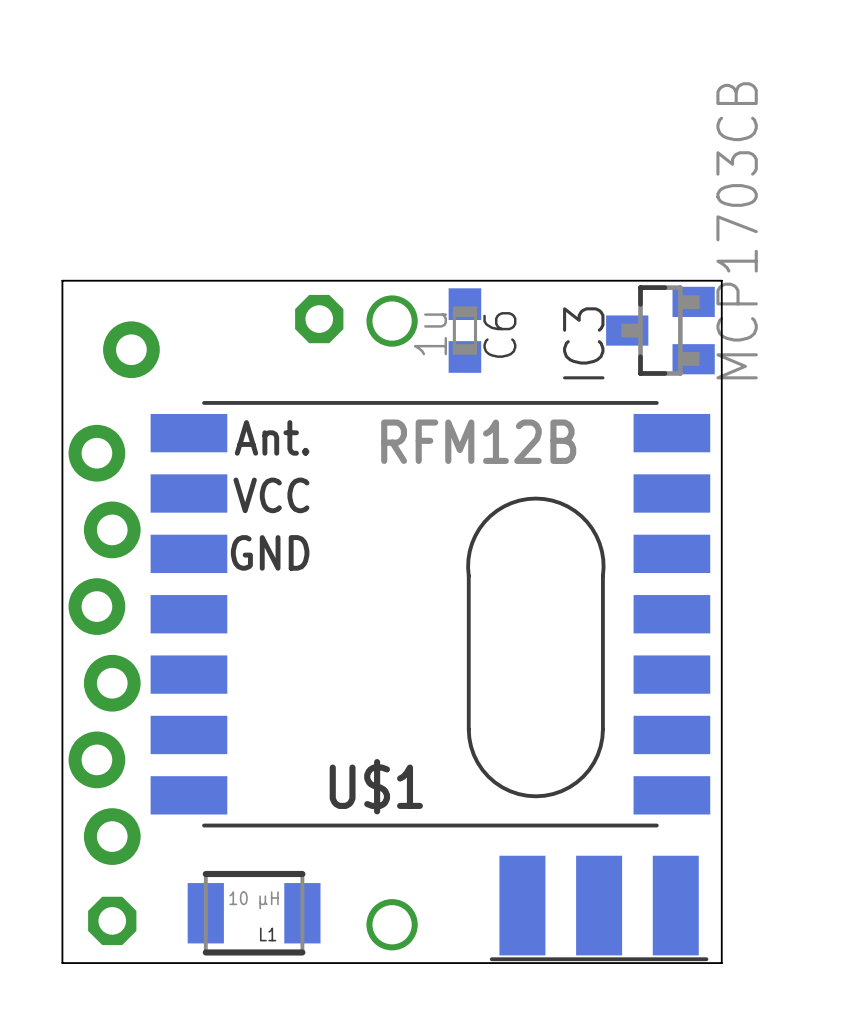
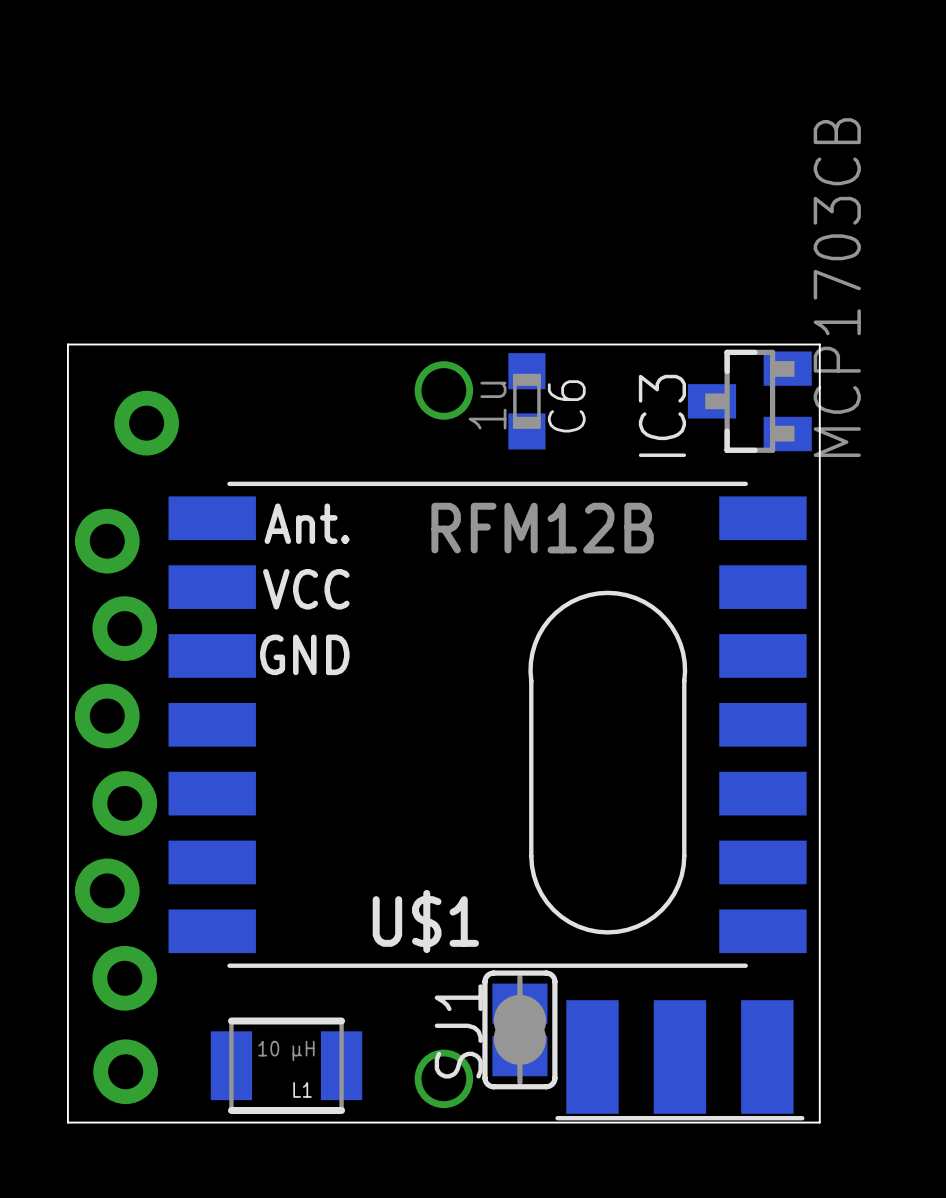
part: (319, 319) -> none
SJ1: none -> (519, 1029)
part footprint: [88, 896, 137, 946] -> [93, 1039, 158, 1105]

